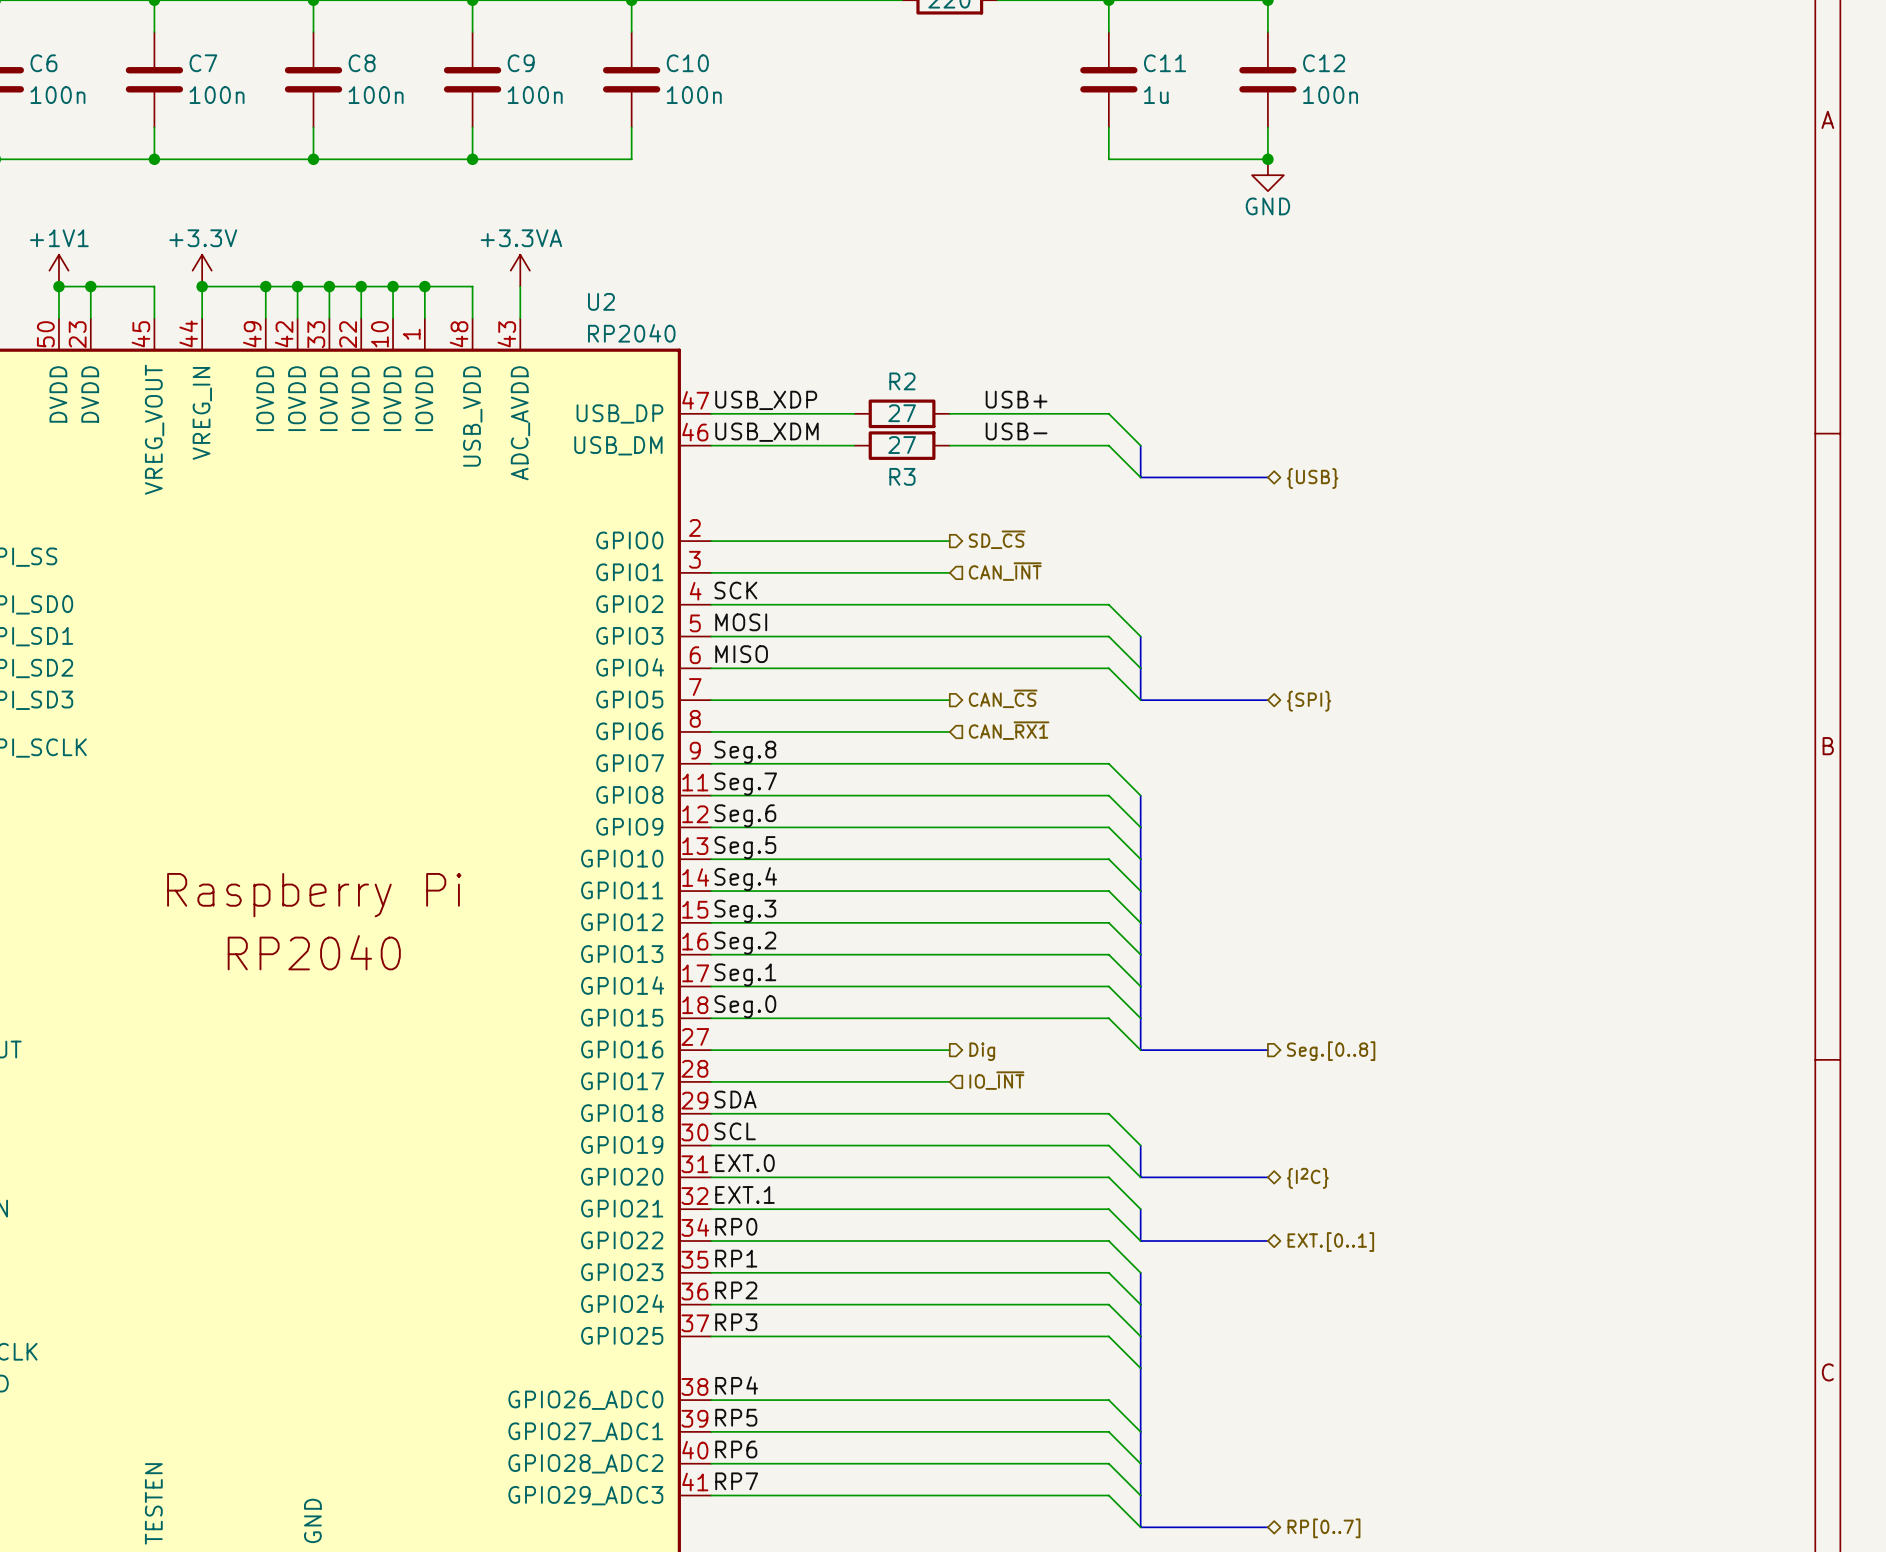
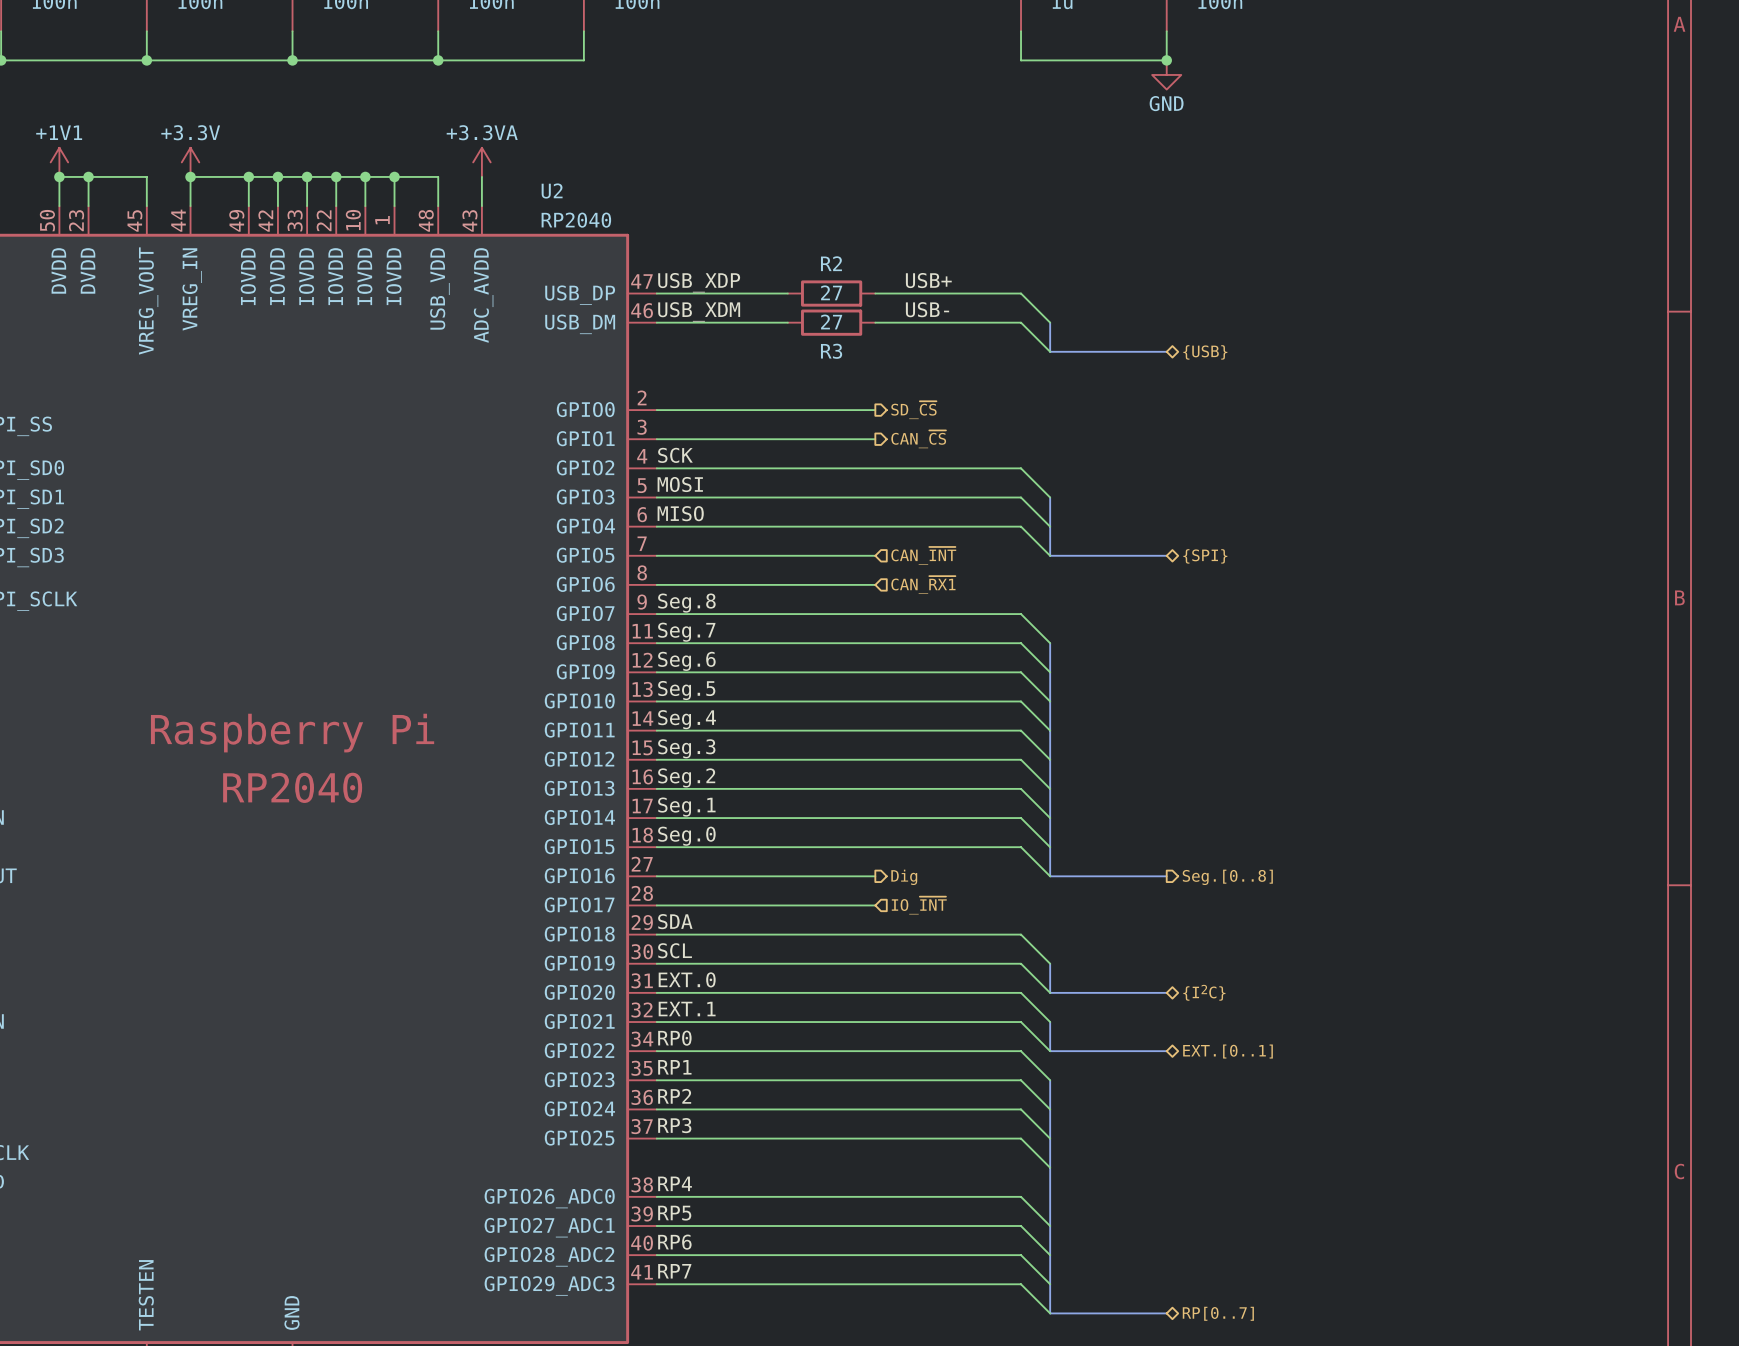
hierarchical label shape: input (1005, 571) -> output (918, 439)
hierarchical label: CAN_~{INT} (1005, 571) -> CAN_~{CS} (918, 439)
hierarchical label shape: output (1003, 698) -> input (923, 555)
hierarchical label: CAN_~{CS} (1003, 698) -> CAN_~{INT} (923, 555)

